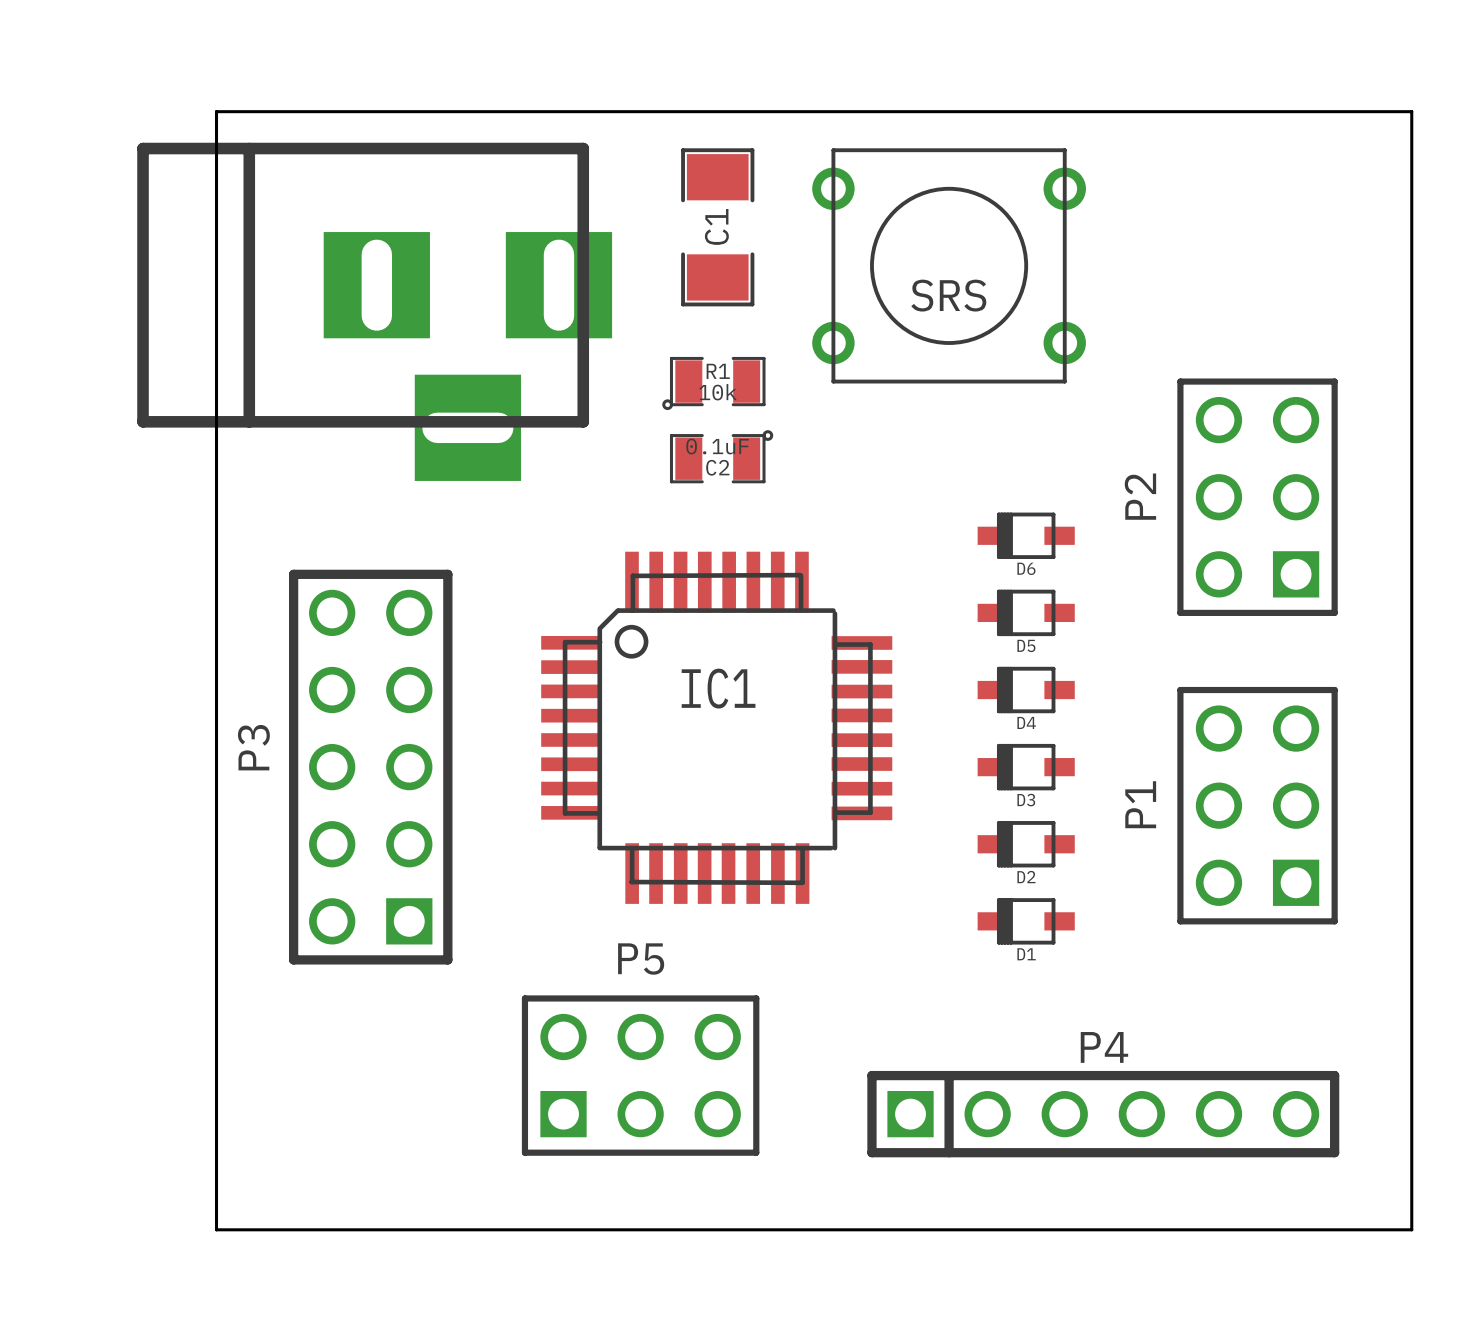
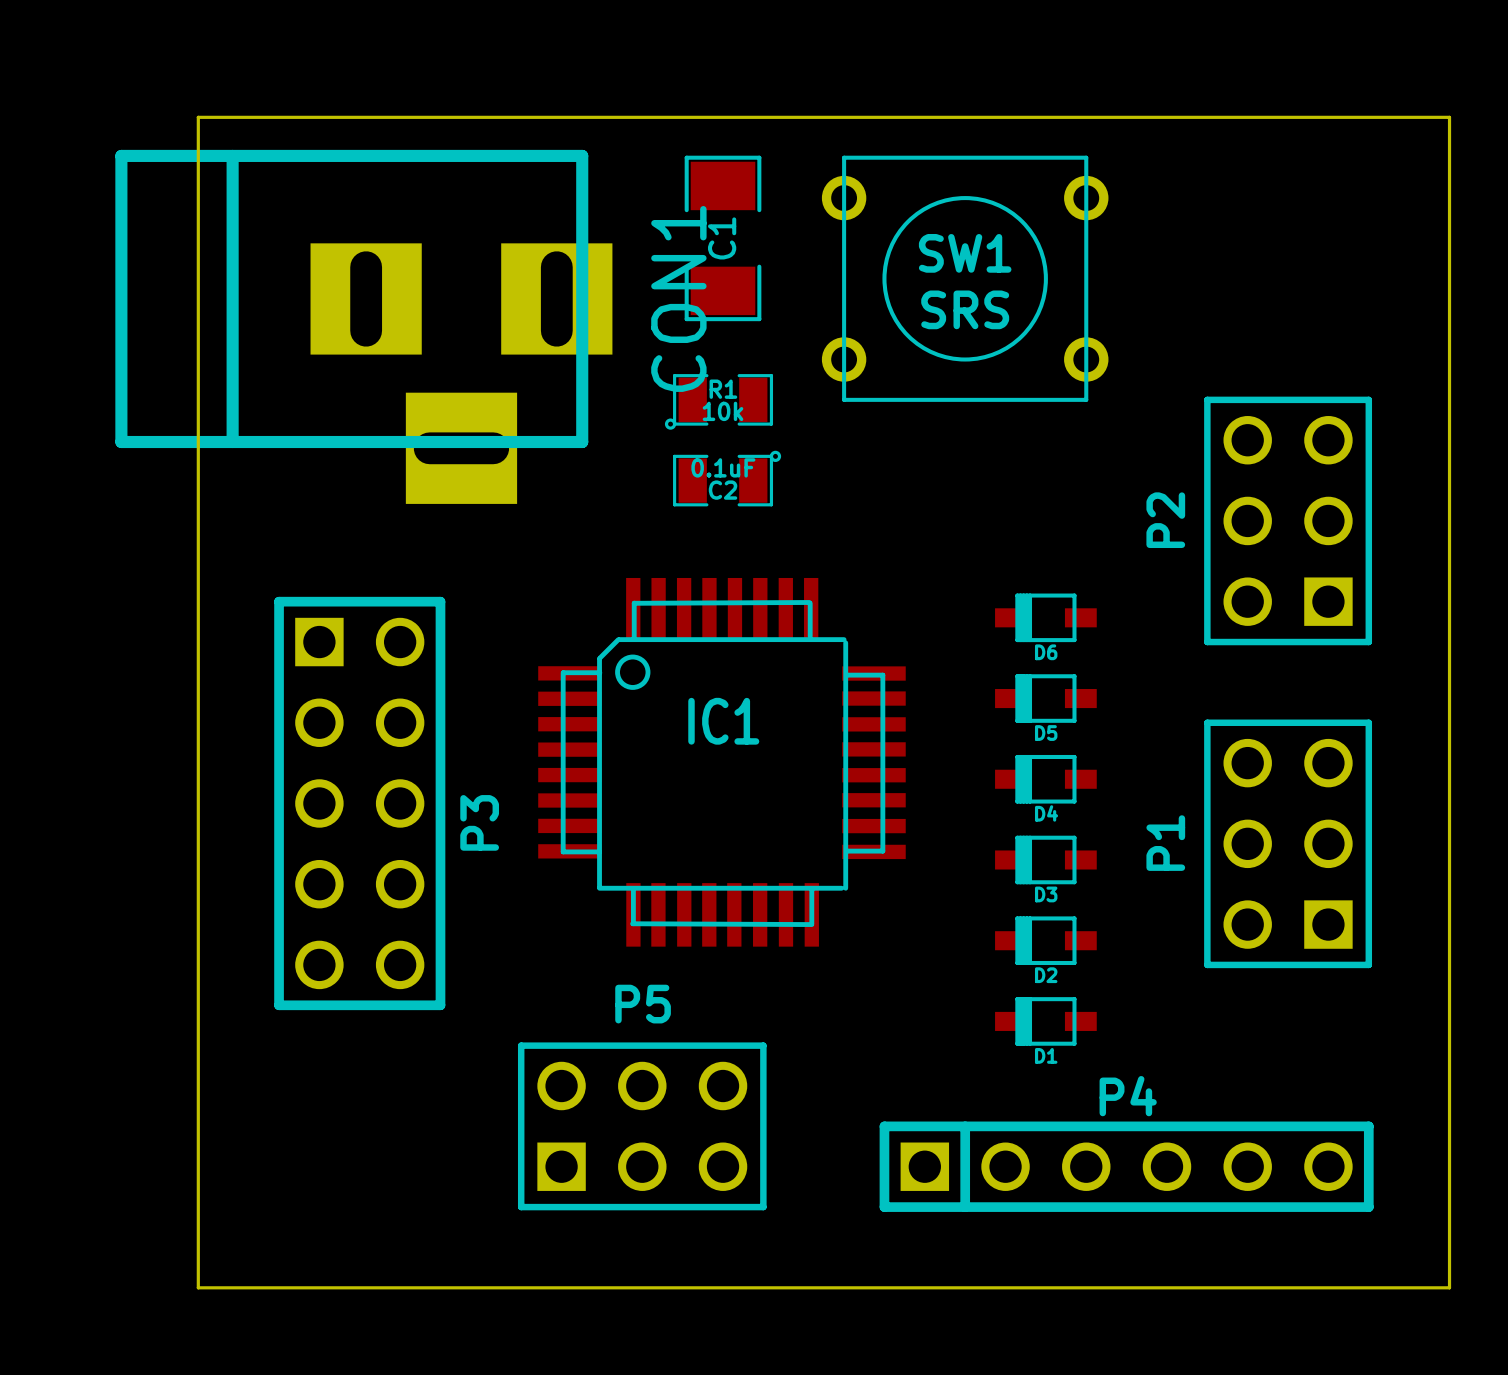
SW1 name: none -> SW1 (965, 253)
CON1 name: none -> CON1 (678, 298)
D6 position: (1026, 535) -> (1045, 617)
D5 position: (1026, 612) -> (1045, 698)
D4 position: (1026, 690) -> (1045, 779)
P3 rotation: 0° (370, 767) -> 180° (359, 803)
D3 position: (1026, 767) -> (1045, 859)
D2 position: (1026, 844) -> (1045, 940)
D1 position: (1026, 921) -> (1045, 1021)

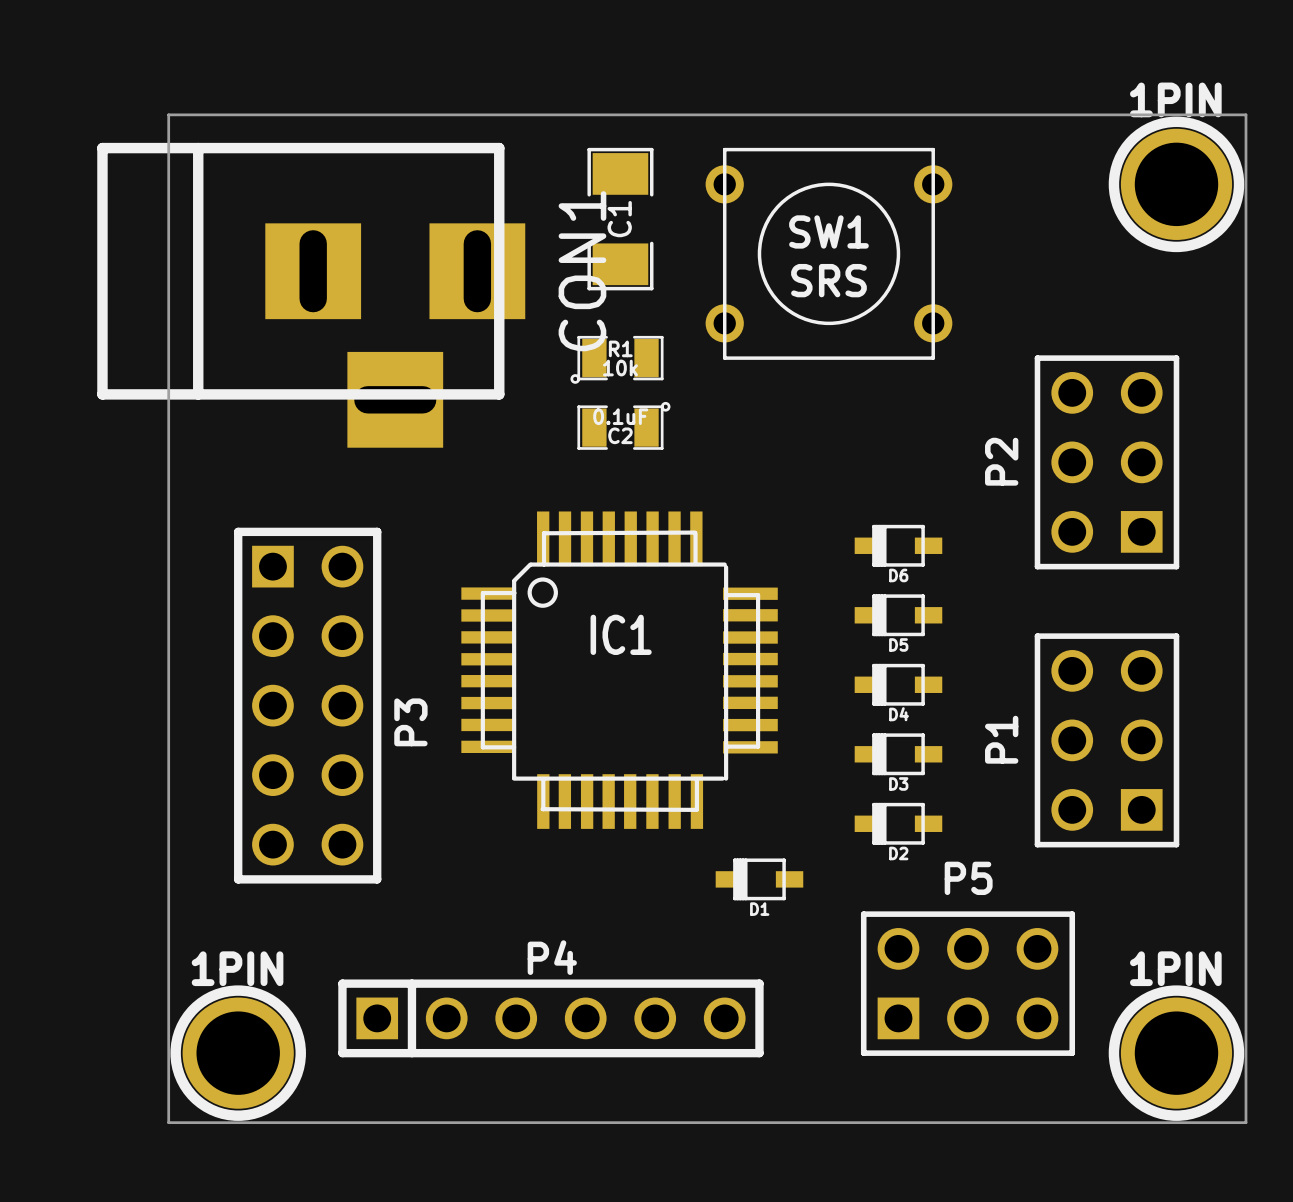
1PIN: none -> (1176, 184)
D1 position: (1045, 1021) -> (759, 879)
P5 position: (642, 1126) -> (967, 983)
P4 position: (1126, 1166) -> (550, 1018)
1PIN: none -> (238, 1053)
1PIN: none -> (1176, 1053)

